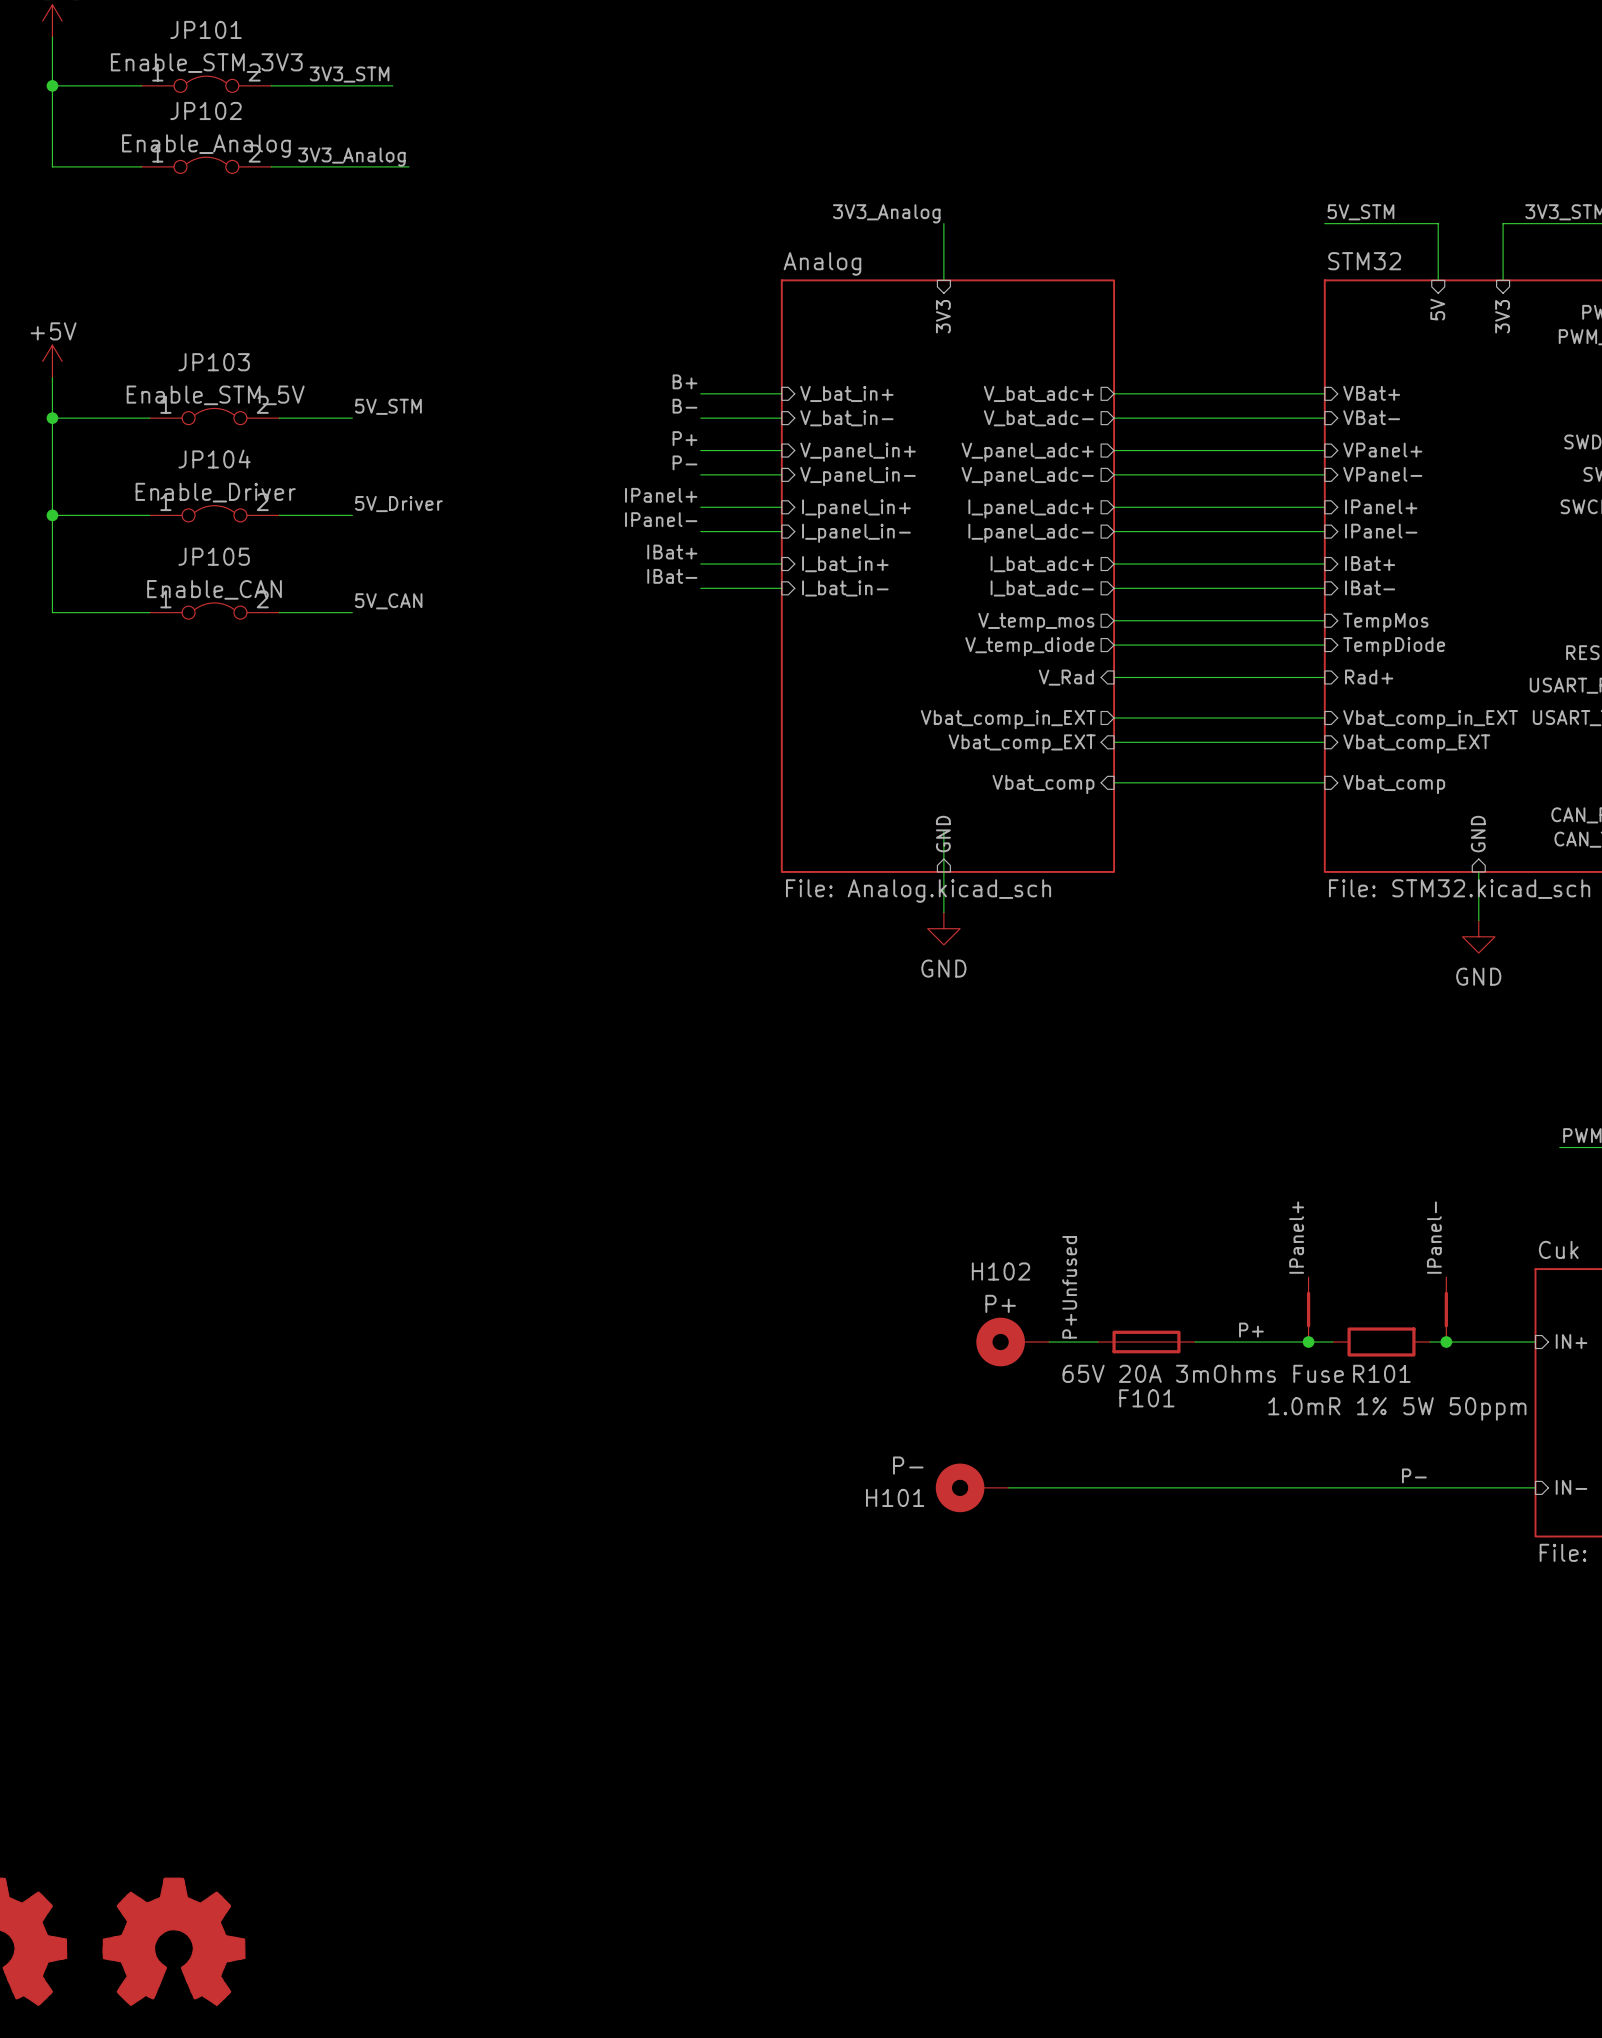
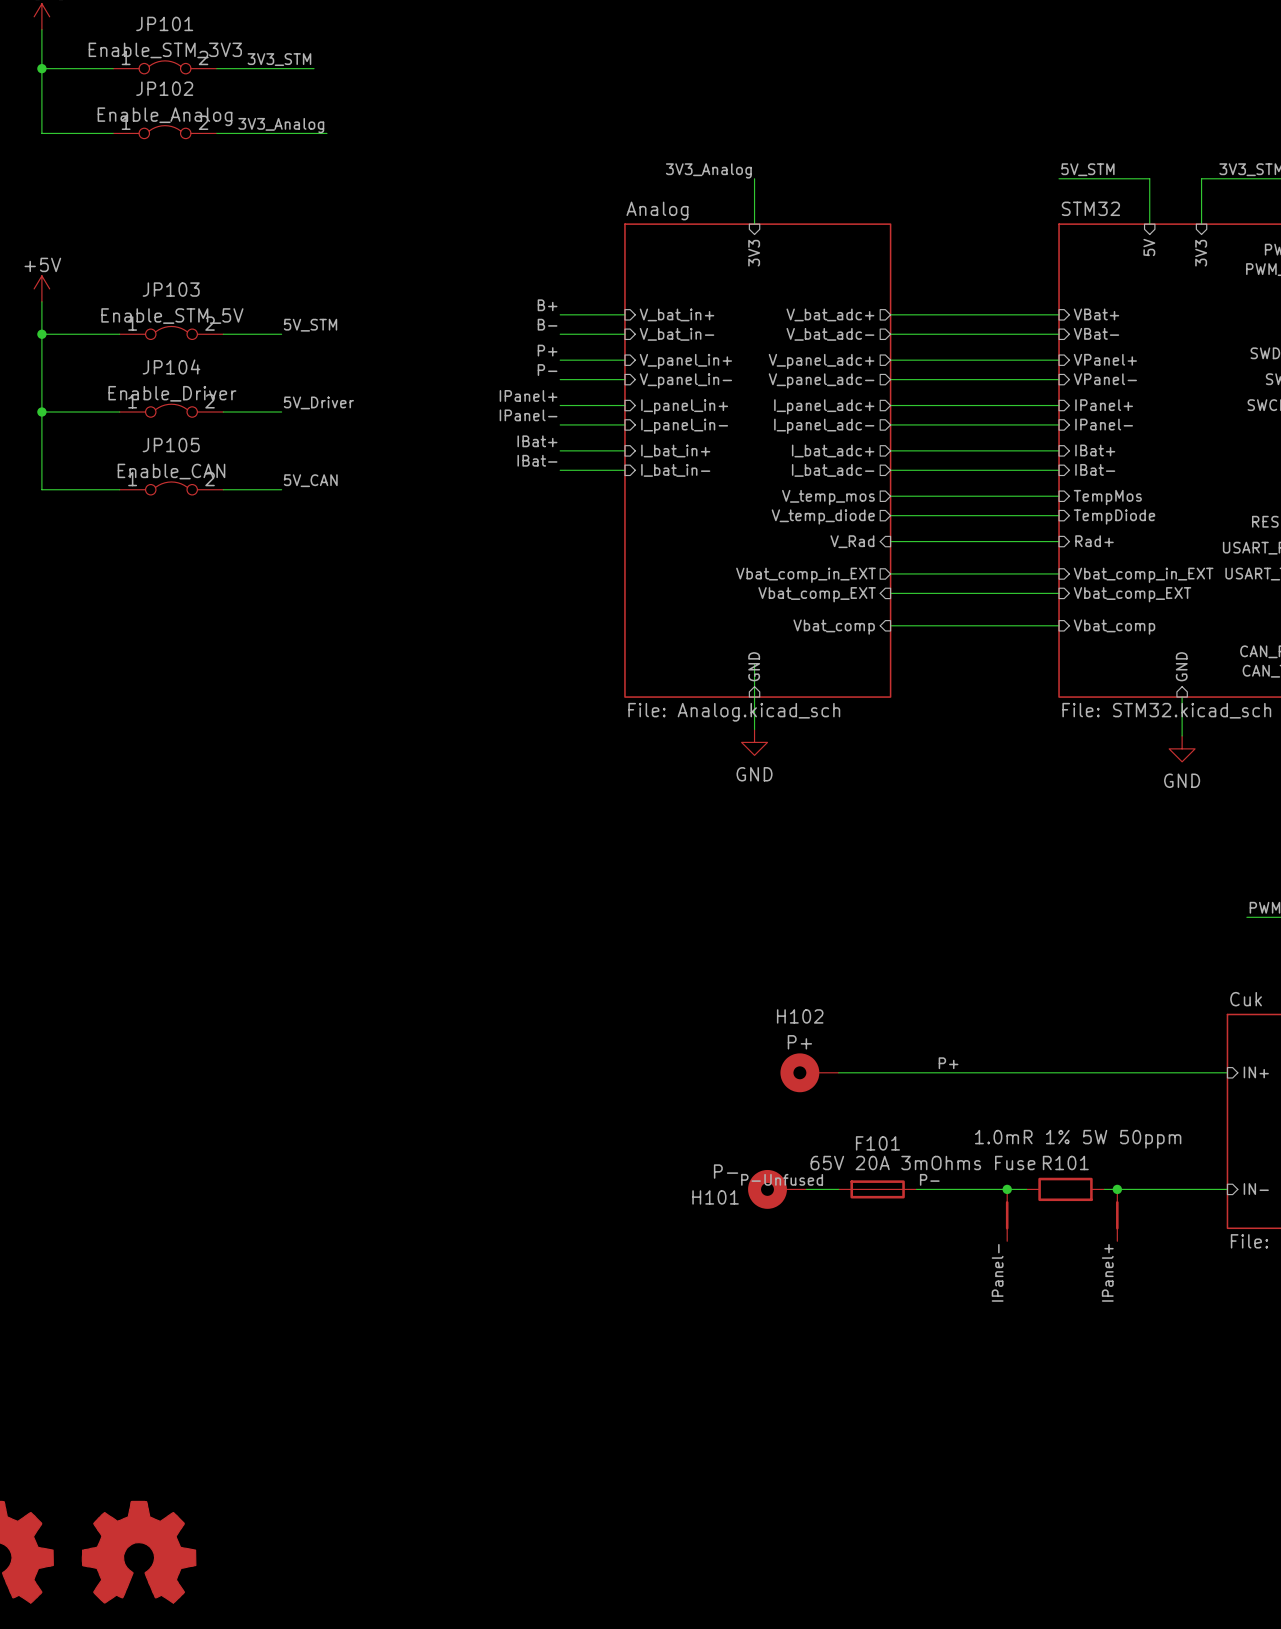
label position: IPanel+ (1296, 1237) -> IPanel+ (1107, 1272)
label: IPanel- (1434, 1237) -> none
label: P+Unfused (1069, 1287) -> none
part: (1308, 1309) -> none
part: (1446, 1309) -> none
label position: P+ (1251, 1330) -> P+ (948, 1063)
F101 position: (1146, 1342) -> (877, 1189)
junction: (1308, 1342) -> none
R101 position: (1381, 1342) -> (1065, 1189)
junction: (1446, 1342) -> none
F101 value position: 65V 20A 3mOhms Fuse (1203, 1373) -> 65V 20A 3mOhms Fuse (922, 1163)
R101 name position: R101 (1381, 1373) -> R101 (1065, 1163)
F101 name position: F101 (1146, 1398) -> F101 (877, 1143)
R101 value position: 1.0mR 1% 5W 50ppm (1397, 1408) -> 1.0mR 1% 5W 50ppm (1078, 1139)
label: none -> P-Unfused (782, 1179)
label position: P- (1414, 1475) -> P- (929, 1179)
junction: none -> (1007, 1189)
wire: (1284, 1487) (1381, 1487) -> (1065, 1072) (1143, 1072)
junction: none -> (1117, 1189)
part: none -> (1007, 1215)
part: none -> (1117, 1215)
label: none -> IPanel- (997, 1272)

